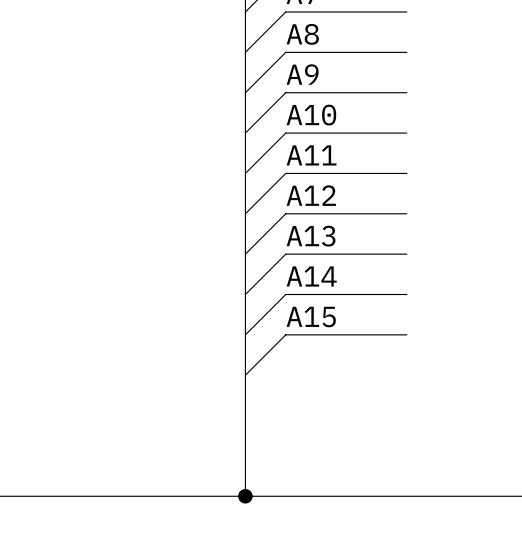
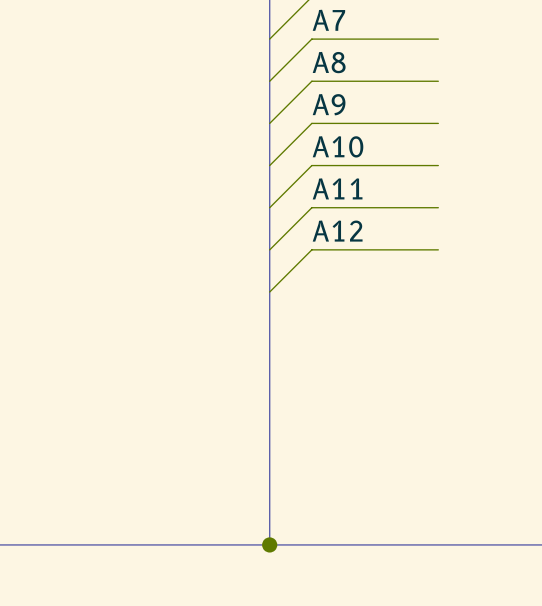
label: A13 (311, 236) -> none
wire: (406, 254) (285, 254) (245, 294) -> none
label: A14 (311, 276) -> none
wire: (406, 294) (285, 294) (245, 334) -> none
label: A15 (311, 317) -> none
wire: (406, 334) (285, 334) (245, 375) -> none

